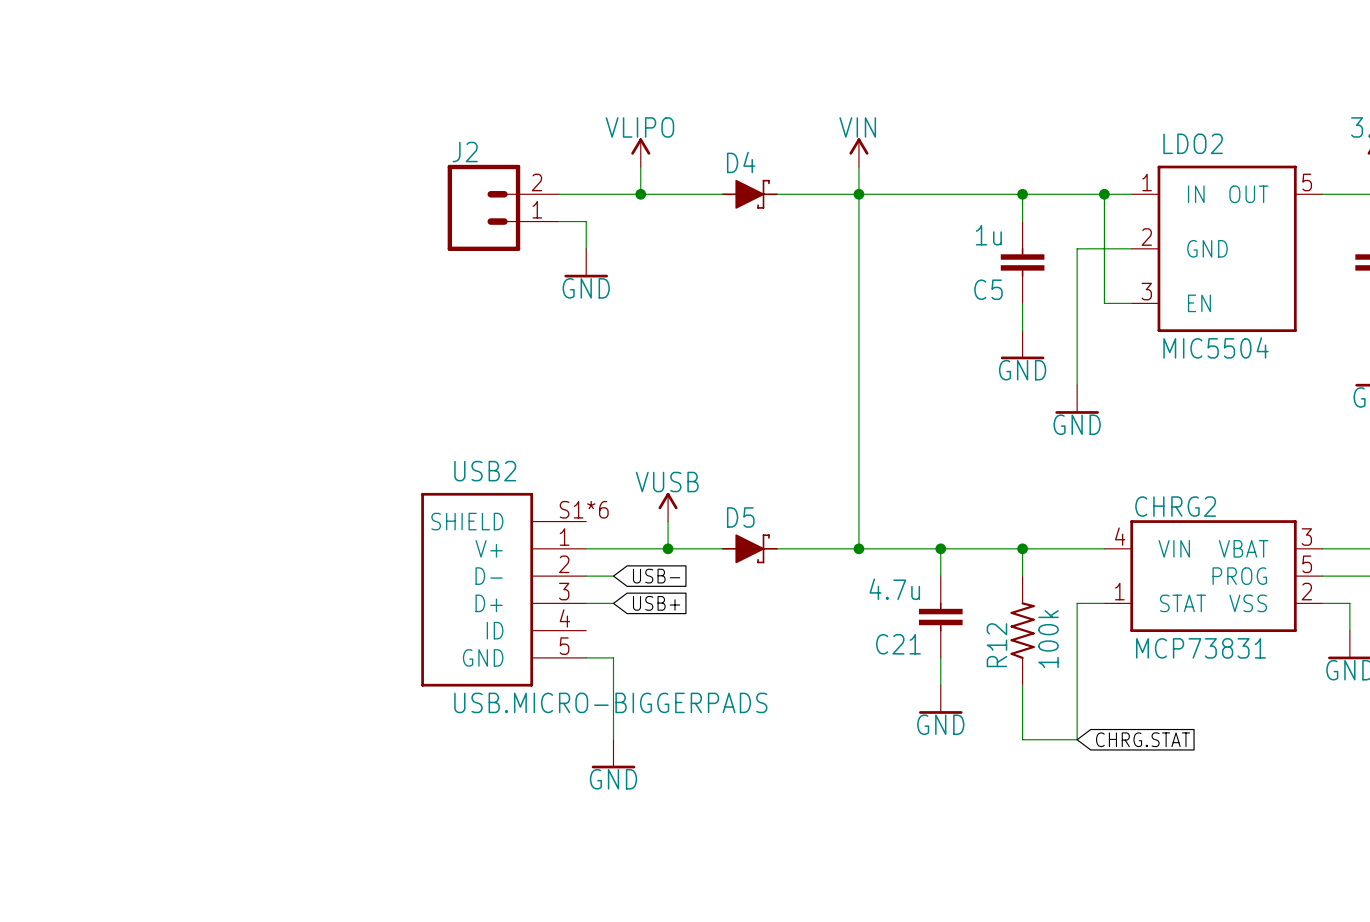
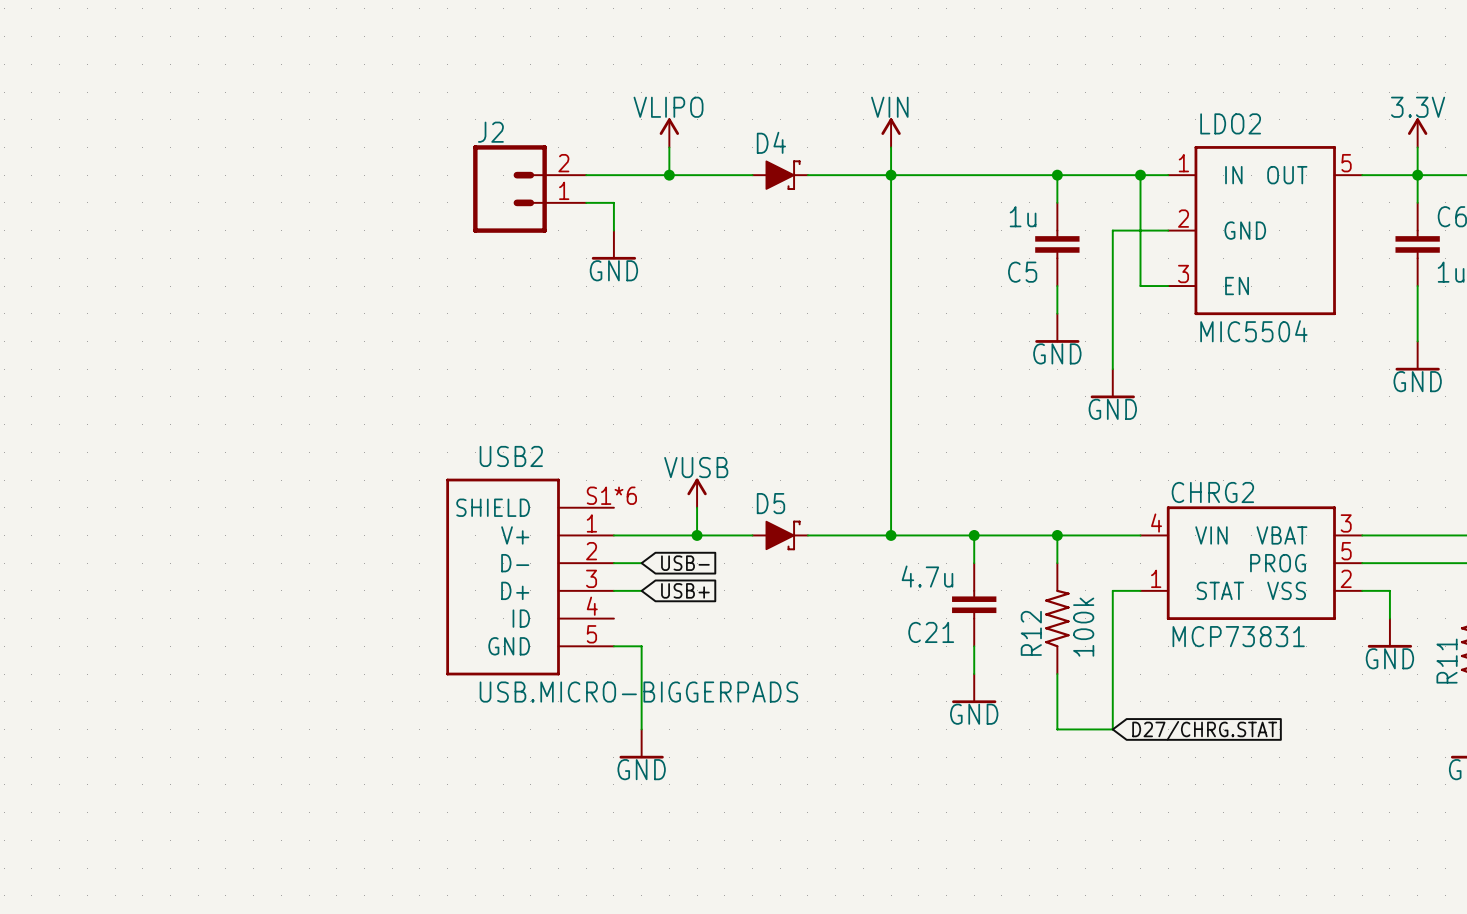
global label: CHRG.STAT (1143, 739) -> D27/CHRG.STAT (1204, 730)

